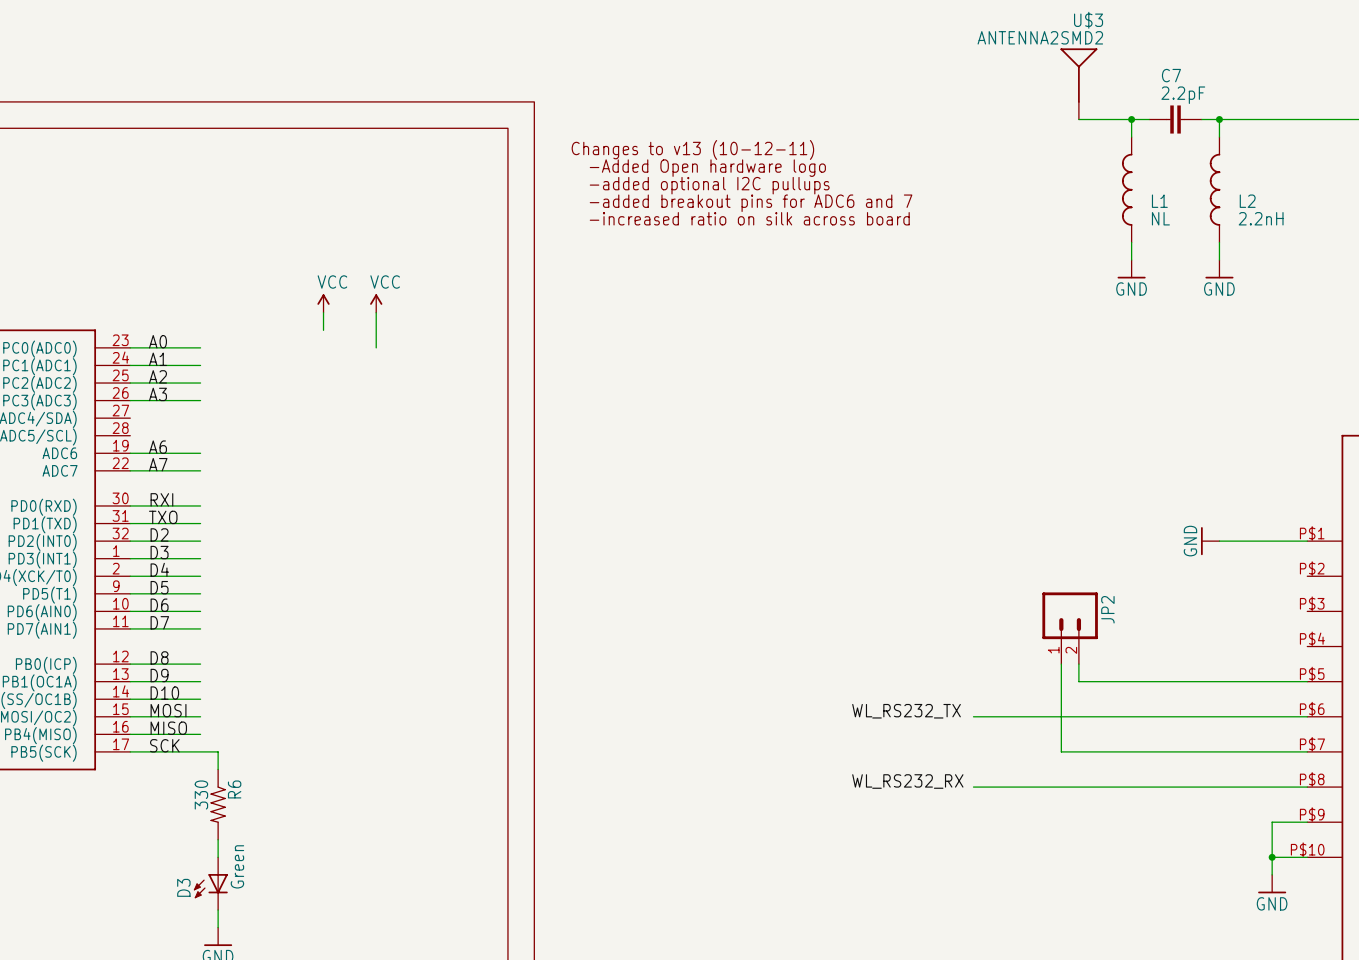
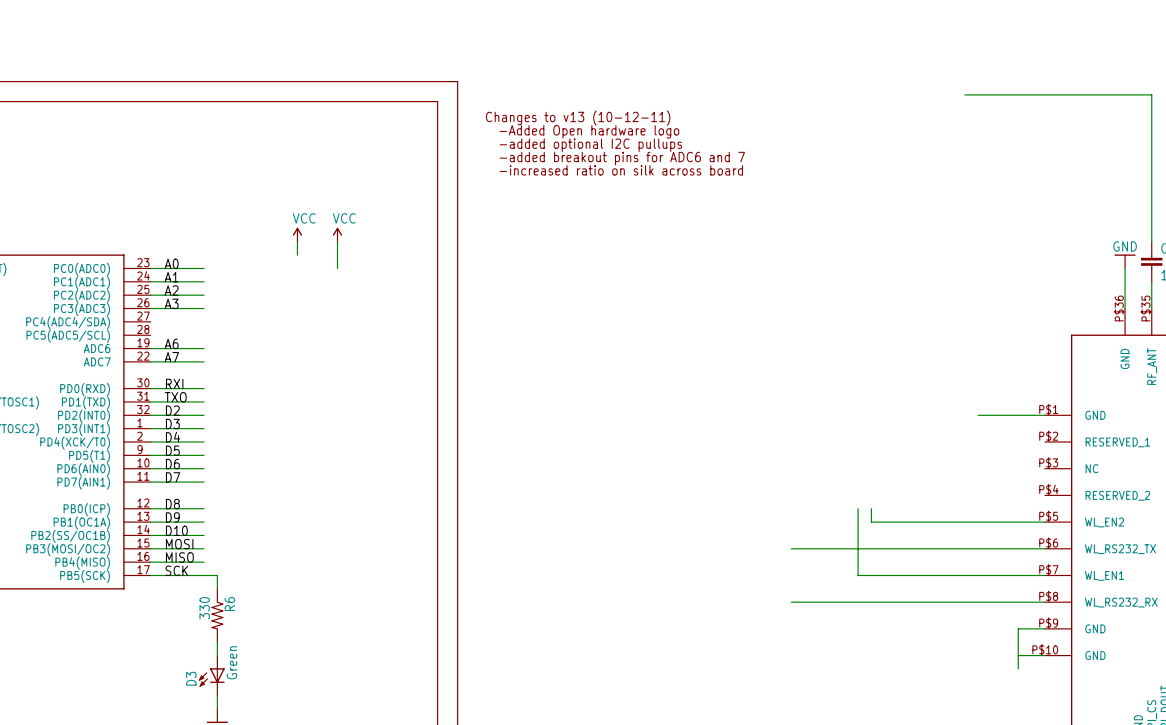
U$3: ANTENNA2SMD2 (1078, 83) -> none
wire: (1078, 119) (1149, 119) -> none
wire: (1131, 119) (1131, 137) -> none
junction: (1131, 119) -> none
C7: 2.2pF (1175, 119) -> none
wire: (1219, 119) (1219, 137) -> none
junction: (1219, 119) -> none
L1: NL (1127, 189) -> none
L2: 2.2nH (1215, 189) -> none
wire: (1131, 242) (1131, 260) -> none
wire: (1219, 242) (1219, 260) -> none
power symbol: GND (1131, 269) -> none
power symbol: GND (1219, 269) -> none
power symbol: GND (1210, 541) -> none
JP2: (1070, 628) -> none
label: WL_RS232_TX (906, 711) -> none
label: WL_RS232_RX (907, 781) -> none
junction: (1272, 857) -> none
power symbol: GND (1272, 884) -> none

